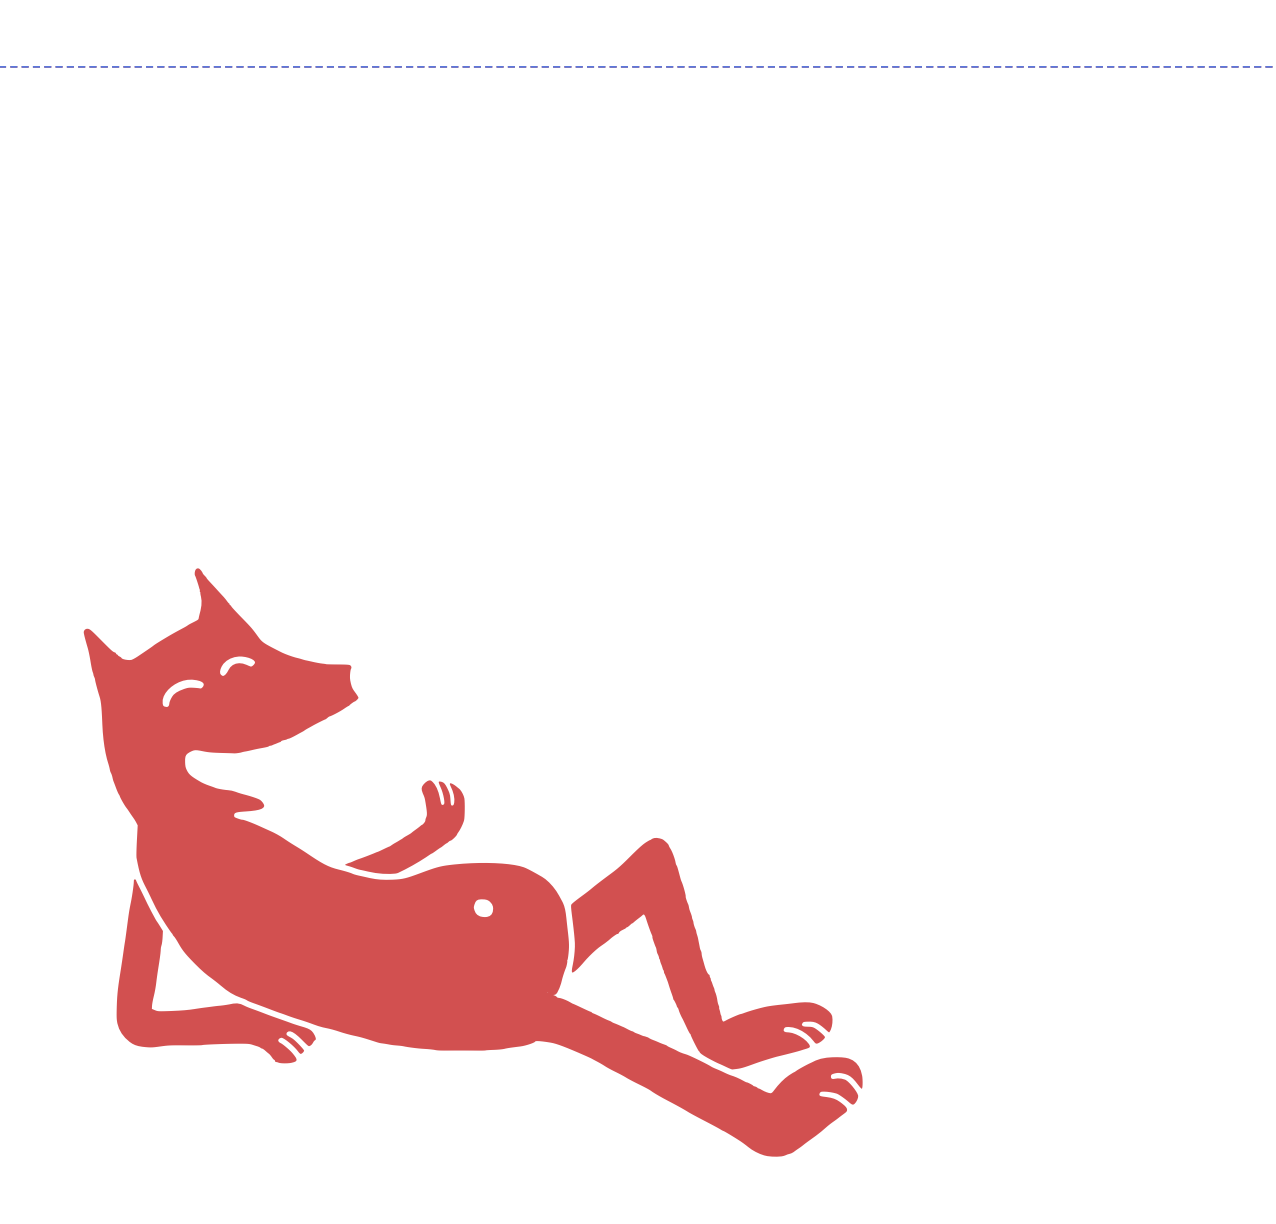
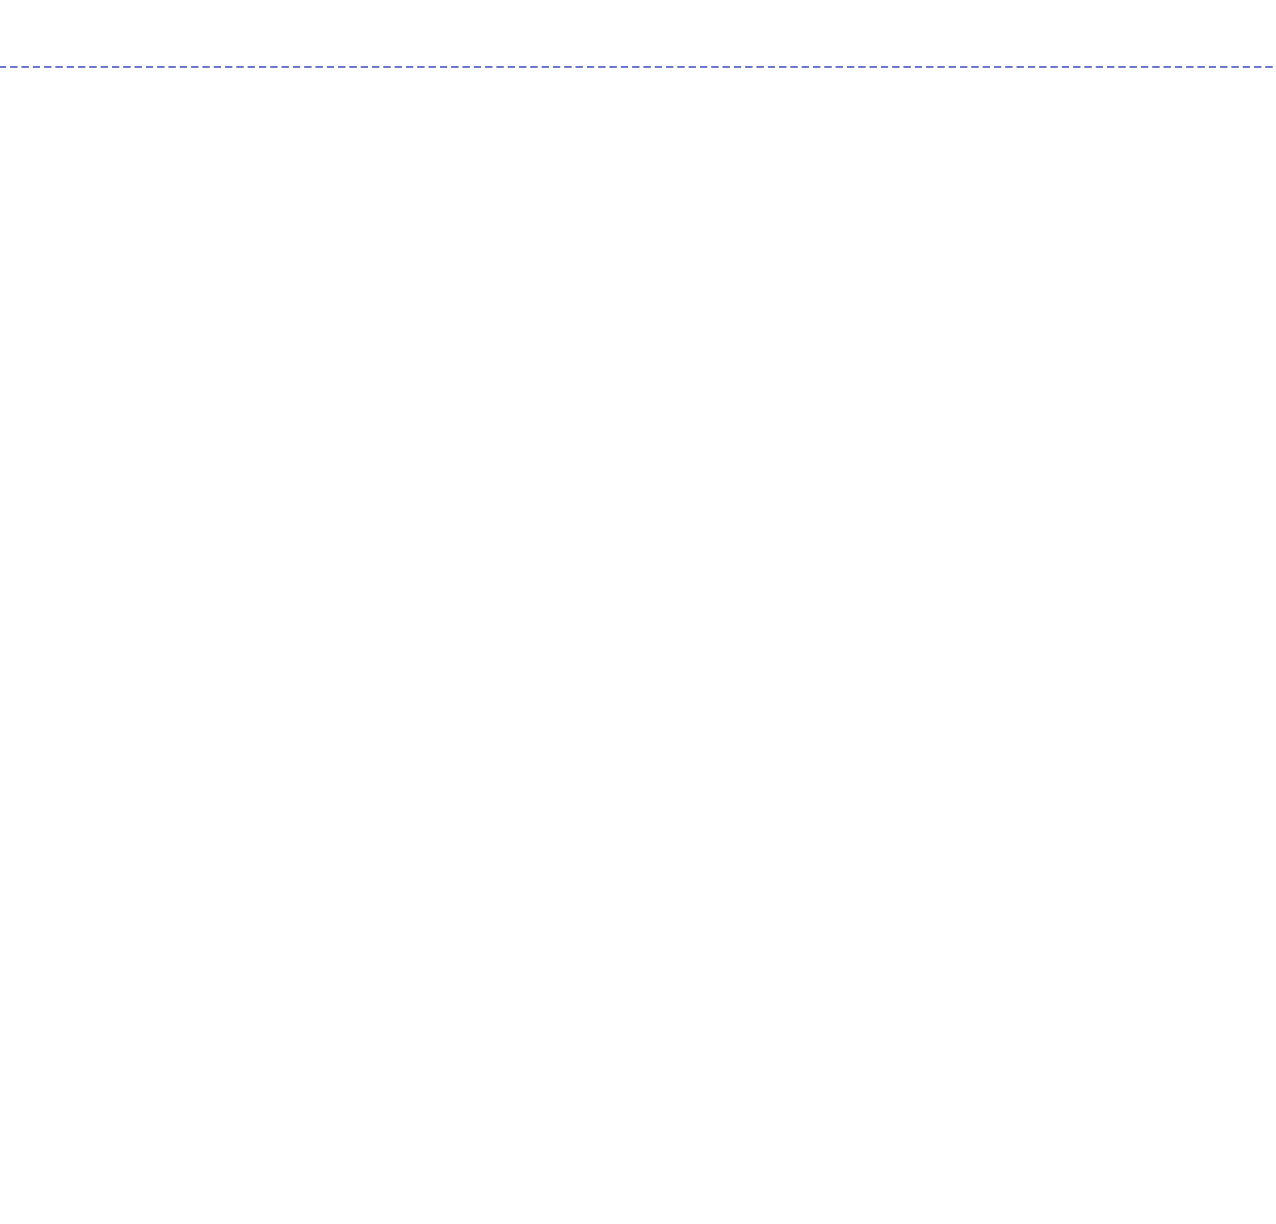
drawing: [83, 568, 863, 1157] -> none

